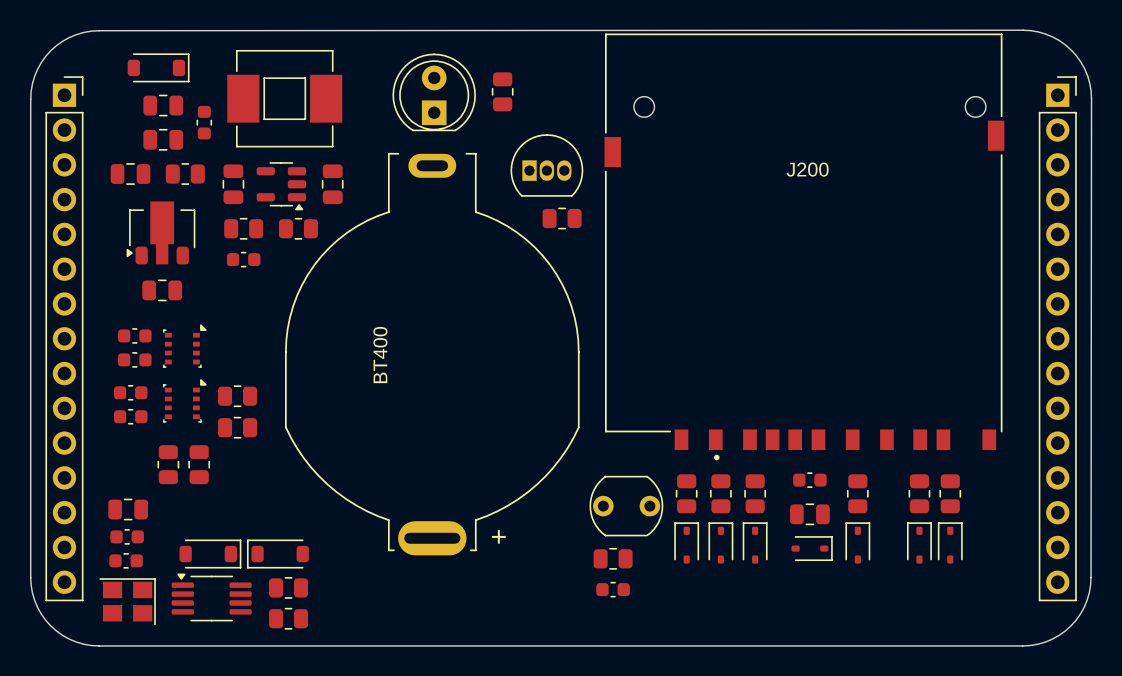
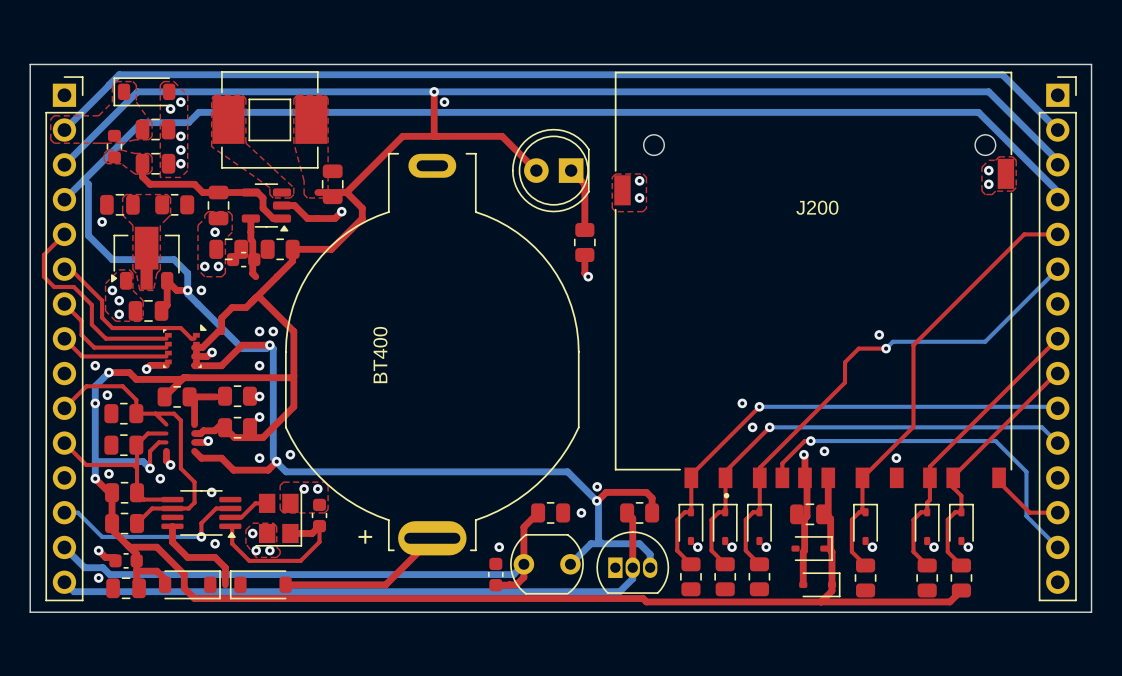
board edge: (1023, 30) (99, 30) (83, 32) (62, 41) (50, 50) (37, 69) (32, 83) (30, 99) (30, 577) (34, 600) (41, 613) (56, 631) (69, 639) (83, 644) (99, 645) (1022, 645) (1037, 644) (1058, 635) (1070, 625) (1080, 613) (1087, 600) (1090, 585) (1091, 91) (1084, 68) (1071, 50) (1052, 37) (1038, 31) (1023, 30) -> (30, 64) (30, 612) (1091, 612) (1091, 64) (30, 64)
part rotation: 0° (158, 67) -> 180° (144, 91)
top zone outline: none -> (115, 81) (132, 81) (136, 85) (136, 102) (152, 122) (152, 136) (148, 139) (134, 139) (121, 143) (54, 143) (50, 139) (50, 119) (54, 115) (98, 115) (112, 102) (112, 85) (115, 81)
top zone outline: none -> (163, 81) (174, 81) (187, 95) (187, 170) (180, 177) (160, 177) (160, 85) (163, 81)
top track: none -> (434, 91) (434, 136)
via: none -> (434, 91)
part: (502, 91) -> none
part: (434, 92) -> none
top zone outline: none -> (215, 95) (211, 98) (211, 146) (269, 187) (269, 194) (273, 197) (290, 197) (293, 194) (293, 187) (245, 143) (245, 98) (242, 95) (215, 95)
top zone outline: none -> (297, 95) (324, 95) (328, 98) (328, 194) (324, 197) (307, 197) (304, 194) (304, 180) (293, 143) (293, 98) (297, 95)
part position: (284, 98) -> (269, 119)
via: none -> (180, 102)
via: none -> (444, 102)
part: (163, 105) -> none
via: none -> (170, 108)
part position: (204, 122) -> (114, 146)
part: none -> (155, 129)
bottom track: none -> (64, 130) (119, 74) (1002, 74) (1057, 130)
part footprint: [510, 134, 584, 197] -> [511, 128, 590, 213]
via: none -> (180, 136)
part: (163, 139) -> none
top zone outline: none -> (107, 150) (104, 153) (104, 160) (107, 163) (121, 163) (134, 174) (148, 174) (152, 170) (152, 156) (148, 153) (107, 150)
via: none -> (180, 150)
top zone outline: none -> (999, 156) (995, 160) (988, 160) (981, 167) (981, 191) (985, 194) (992, 194) (995, 191) (1012, 191) (1016, 187) (1016, 160) (1012, 156) (999, 156)
top track: none -> (142, 163) (142, 176) (150, 184) (194, 184) (202, 192) (257, 192) (263, 197) (263, 208) (273, 218) (282, 218)
part: none -> (155, 163)
via: none -> (180, 163)
bottom track: none -> (64, 164) (137, 91) (988, 91) (1057, 160) (1057, 164)
top track: none -> (536, 170) (502, 136) (402, 136) (346, 192)
top track: none -> (571, 170) (584, 184) (584, 229)
via: none -> (988, 170)
part: (130, 174) -> none
part position: (185, 174) -> (174, 204)
top zone outline: none -> (615, 174) (643, 174) (646, 177) (646, 208) (643, 211) (615, 211) (612, 208) (612, 177) (615, 174)
bottom track: none -> (84, 179) (88, 184) (88, 235) (112, 259) (174, 259) (187, 273) (187, 293) (242, 348) (266, 348) (269, 345) (273, 348) (273, 458) (286, 471) (567, 471) (598, 502) (598, 540) (601, 543)
via: none -> (639, 180)
part position: (233, 184) -> (218, 205)
via: none -> (988, 184)
part position: (281, 186) -> (266, 207)
top track: none -> (317, 192) (346, 192)
top track: none -> (346, 192) (362, 208) (362, 218) (331, 249) (292, 249) (292, 261) (246, 307) (232, 307) (221, 318) (221, 331) (218, 331) (202, 347) (194, 347)
top zone outline: none -> (126, 194) (167, 194) (170, 197) (170, 215) (160, 225) (160, 269) (156, 273) (153, 290) (139, 290) (136, 273) (132, 269) (132, 225) (122, 215) (122, 197) (126, 194)
via: none -> (639, 197)
bottom track: none -> (64, 199) (141, 122) (188, 122) (198, 112) (978, 112) (1057, 191) (1057, 199)
part: none -> (119, 204)
top track: none -> (282, 205) (294, 205) (307, 218) (334, 218) (341, 211)
top zone outline: none -> (208, 211) (228, 211) (232, 215) (232, 232) (225, 239) (225, 273) (221, 276) (204, 276) (197, 269) (197, 225) (208, 211)
via: none -> (341, 211)
top track: none -> (250, 218) (250, 239)
part rotation: 0° (562, 218) -> 90° clockwise (584, 242)
part position: (562, 218) -> (584, 242)
via: none -> (102, 221)
part: (243, 228) -> none
part: (298, 228) -> none
part position: (160, 232) -> (145, 258)
via: none -> (215, 232)
top track: none -> (64, 234) (43, 254) (43, 276) (54, 286) (73, 286) (91, 304) (91, 324) (105, 338) (166, 338)
top track: none -> (1057, 234) (1024, 234) (913, 345) (913, 426) (862, 477) (862, 509) (865, 512) (859, 512) (851, 519) (851, 551) (865, 565)
top track: none -> (252, 241) (252, 273) (255, 276)
J200 position: (804, 246) -> (814, 285)
part: none -> (228, 249)
part: none -> (280, 249)
top track: none -> (584, 254) (584, 273) (588, 276)
via: none -> (204, 266)
via: none -> (218, 266)
top track: none -> (64, 269) (70, 269) (102, 300) (102, 317) (112, 328) (180, 328) (191, 338) (194, 338)
top zone outline: none -> (119, 269) (129, 269) (132, 273) (132, 290) (143, 300) (143, 317) (139, 321) (115, 321) (105, 310) (105, 283) (119, 269)
bottom track: none -> (1057, 269) (985, 341) (892, 341) (886, 348)
via: none -> (588, 276)
via: none -> (112, 290)
part position: (162, 290) -> (148, 310)
top track: none -> (187, 290) (176, 290) (167, 280) (167, 305) (161, 310)
via: none -> (187, 290)
via: none -> (201, 290)
top track: none -> (256, 297) (259, 297) (293, 331) (293, 406) (263, 437) (234, 437) (221, 424) (214, 430) (203, 430) (200, 433) (194, 433)
via: none -> (119, 300)
top track: none -> (64, 303) (81, 321) (81, 334) (94, 347) (166, 347)
via: none -> (119, 314)
via: none -> (259, 331)
via: none -> (273, 331)
via: none -> (879, 334)
part: (134, 335) -> none
top track: none -> (64, 338) (82, 356) (166, 356)
top track: none -> (1057, 338) (929, 466) (929, 499) (927, 502) (927, 512) (921, 512) (913, 519) (913, 551) (927, 565)
top track: none -> (269, 345) (242, 345) (221, 365) (194, 365)
via: none -> (269, 345)
top track: none -> (886, 348) (858, 348) (845, 362) (845, 382) (759, 467) (759, 511) (753, 512) (745, 519) (745, 550) (759, 564)
via: none -> (886, 348)
top track: none -> (212, 352) (207, 356) (194, 356)
via: none -> (212, 352)
part: (134, 359) -> none
via: none -> (95, 365)
top track: none -> (166, 365) (150, 365) (146, 369)
via: none -> (259, 365)
via: none -> (146, 369)
top track: none -> (108, 372) (129, 372) (136, 379) (182, 379)
bottom track: none -> (108, 372) (95, 386) (95, 478)
via: none -> (108, 372)
top track: none -> (1057, 373) (953, 476) (953, 487) (961, 495) (961, 512) (955, 512) (947, 519) (947, 551) (961, 565)
top track: none -> (293, 376) (292, 377) (183, 377) (164, 396)
part footprint: [163, 379, 207, 423] -> [157, 386, 197, 408]
part: (130, 392) -> none
via: none -> (107, 395)
top track: none -> (215, 396) (189, 396) (194, 401) (194, 424)
via: none -> (259, 396)
via: none -> (95, 403)
via: none -> (742, 403)
top track: none -> (759, 406) (691, 474) (691, 511) (684, 512) (677, 519) (677, 550) (690, 564)
bottom track: none -> (759, 406) (1057, 408)
via: none -> (759, 406)
top track: none -> (64, 408) (86, 386) (122, 386) (136, 399) (136, 413) (174, 413) (180, 420) (180, 468) (194, 482) (194, 502) (188, 508) (152, 508) (137, 523)
part footprint: [113, 408, 148, 425] -> [104, 402, 144, 425]
top track: none -> (155, 413) (166, 424)
via: none -> (259, 417)
via: none -> (752, 427)
top track: none -> (769, 427) (725, 471) (725, 511) (719, 512) (711, 519) (711, 550) (725, 564)
bottom track: none -> (769, 427) (1042, 427) (1057, 443)
via: none -> (769, 427)
top track: none -> (166, 433) (147, 433) (136, 445) (137, 492) (143, 499) (172, 499)
top track: none -> (208, 441) (194, 442)
via: none -> (208, 441)
top track: none -> (810, 441) (804, 441) (782, 463) (782, 477)
bottom track: none -> (810, 441) (995, 441) (1026, 471) (1026, 516) (1057, 547)
via: none -> (810, 441)
top track: none -> (166, 442) (158, 442) (150, 451) (150, 468)
top track: none -> (64, 443) (86, 465) (133, 465) (137, 468)
part: none -> (123, 445)
top track: none -> (166, 451) (166, 460) (170, 465)
top track: none -> (194, 451) (201, 458) (221, 458) (233, 470) (268, 470) (276, 461)
via: none -> (824, 451)
via: none -> (290, 454)
top track: none -> (803, 454) (804, 477) (807, 479) (807, 516) (804, 518) (803, 584)
via: none -> (803, 454)
via: none -> (259, 458)
via: none -> (896, 458)
bottom track: none -> (95, 461) (143, 461) (150, 468)
via: none -> (276, 461)
part: (168, 464) -> none
part: (199, 464) -> none
via: none -> (170, 465)
via: none -> (150, 468)
via: none -> (108, 473)
top track: none -> (828, 477) (832, 591) (821, 601)
top track: none -> (999, 477) (999, 482) (1029, 512) (1057, 512)
top track: none -> (95, 478) (109, 492) (112, 492) (112, 529) (136, 554) (136, 585) (139, 588)
via: none -> (95, 478)
via: none -> (160, 478)
part: (809, 480) -> none
top zone outline: none -> (283, 482) (280, 485) (280, 509) (283, 512) (324, 512) (328, 509) (328, 485) (324, 482) (283, 482)
via: none -> (597, 486)
via: none -> (304, 488)
via: none -> (317, 488)
part: none -> (124, 492)
via: none -> (211, 492)
part: (686, 493) -> none
part: (720, 493) -> none
part: (755, 493) -> none
part: (857, 493) -> none
part: (919, 493) -> none
part: (950, 493) -> none
top track: none -> (596, 500) (606, 492) (646, 492) (652, 498) (652, 512) (650, 514)
via: none -> (596, 500)
top track: none -> (267, 503) (255, 503) (241, 517) (230, 517)
part position: (626, 505) -> (546, 564)
top track: none -> (230, 508) (216, 508) (201, 523) (201, 536)
part: (128, 509) -> none
bottom track: none -> (64, 512) (77, 512) (102, 536) (201, 536)
top track: none -> (538, 512) (523, 527) (523, 577) (516, 584) (495, 585)
part: none -> (550, 512)
via: none -> (581, 512)
top track: none -> (627, 512) (632, 518) (632, 567)
part: none -> (639, 512)
part: none -> (319, 515)
part: none -> (278, 518)
part: none -> (124, 523)
top zone outline: none -> (252, 523) (273, 523) (276, 526) (276, 547) (280, 550) (280, 554) (276, 557) (256, 557) (245, 543) (245, 530) (252, 523)
part: none -> (690, 524)
part: none -> (725, 524)
part: none -> (759, 524)
part: none -> (927, 524)
part: none -> (961, 524)
top track: none -> (172, 526) (172, 542) (187, 557) (215, 557) (225, 567) (225, 584)
top track: none -> (230, 526) (232, 528) (232, 543) (249, 560) (300, 560) (319, 542) (319, 526) (312, 533) (290, 533)
via: none -> (252, 533)
part: (127, 536) -> none
via: none -> (201, 536)
BT400 text position: + (498, 536) -> + (365, 536)
top track: none -> (432, 538) (385, 584) (285, 584)
part: (686, 542) -> none
part: (720, 542) -> none
part: (755, 542) -> none
part position: (857, 542) -> (865, 524)
part: (919, 542) -> none
part: (950, 542) -> none
via: none -> (215, 543)
bottom track: none -> (64, 547) (84, 567) (102, 567) (109, 574) (513, 574) (523, 564)
top track: none -> (129, 547) (156, 547) (184, 574) (184, 588) (194, 598) (643, 598) (646, 601) (949, 601) (961, 590)
via: none -> (499, 547)
via: none -> (697, 547)
via: none -> (732, 547)
via: none -> (766, 547)
via: none -> (872, 547)
via: none -> (934, 547)
via: none -> (968, 547)
top track: none -> (98, 550) (105, 557) (115, 557)
via: none -> (98, 550)
via: none -> (256, 550)
via: none -> (269, 550)
part: (210, 554) -> none
part: (277, 554) -> none
part: (613, 558) -> none
part: none -> (632, 562)
bottom track: none -> (570, 564) (591, 543) (639, 543) (650, 554) (650, 567)
bottom track: none -> (632, 567) (632, 578) (619, 591) (73, 591) (64, 582)
top track: none -> (136, 571) (156, 571) (165, 579) (165, 584)
part: none -> (690, 576)
part: none -> (725, 576)
part: none -> (759, 576)
via: none -> (98, 577)
part: none -> (865, 577)
part: none -> (927, 577)
part: none -> (961, 577)
part footprint: [99, 578, 156, 626] -> [106, 577, 146, 600]
part: none -> (189, 584)
part: none -> (260, 584)
part: none -> (819, 584)
part: (288, 587) -> none
part rotation: 0° (613, 589) -> 90° clockwise (495, 574)
part position: (613, 589) -> (495, 574)
part rotation: 0° (211, 597) -> 180° (201, 514)
part position: (211, 597) -> (201, 514)
part: (288, 618) -> none

